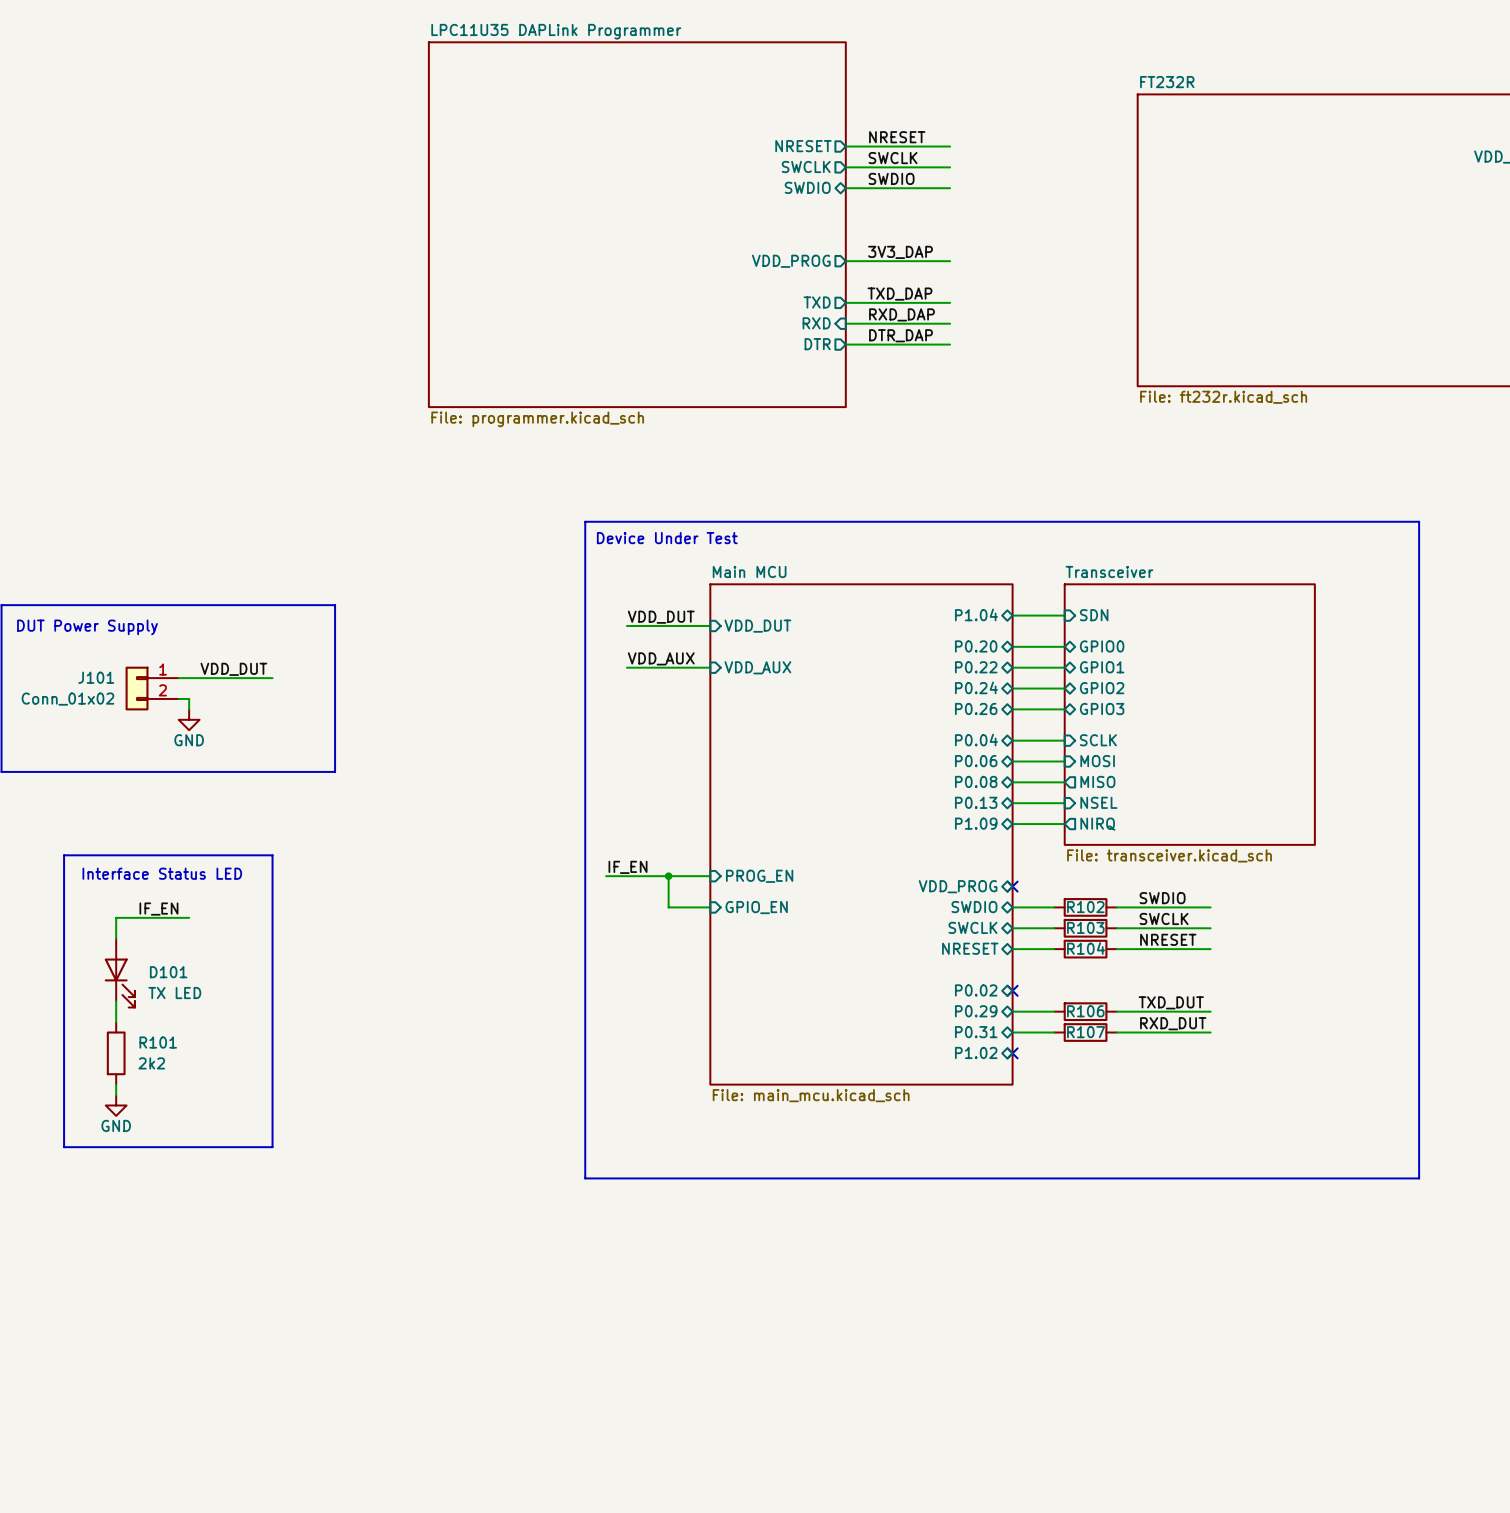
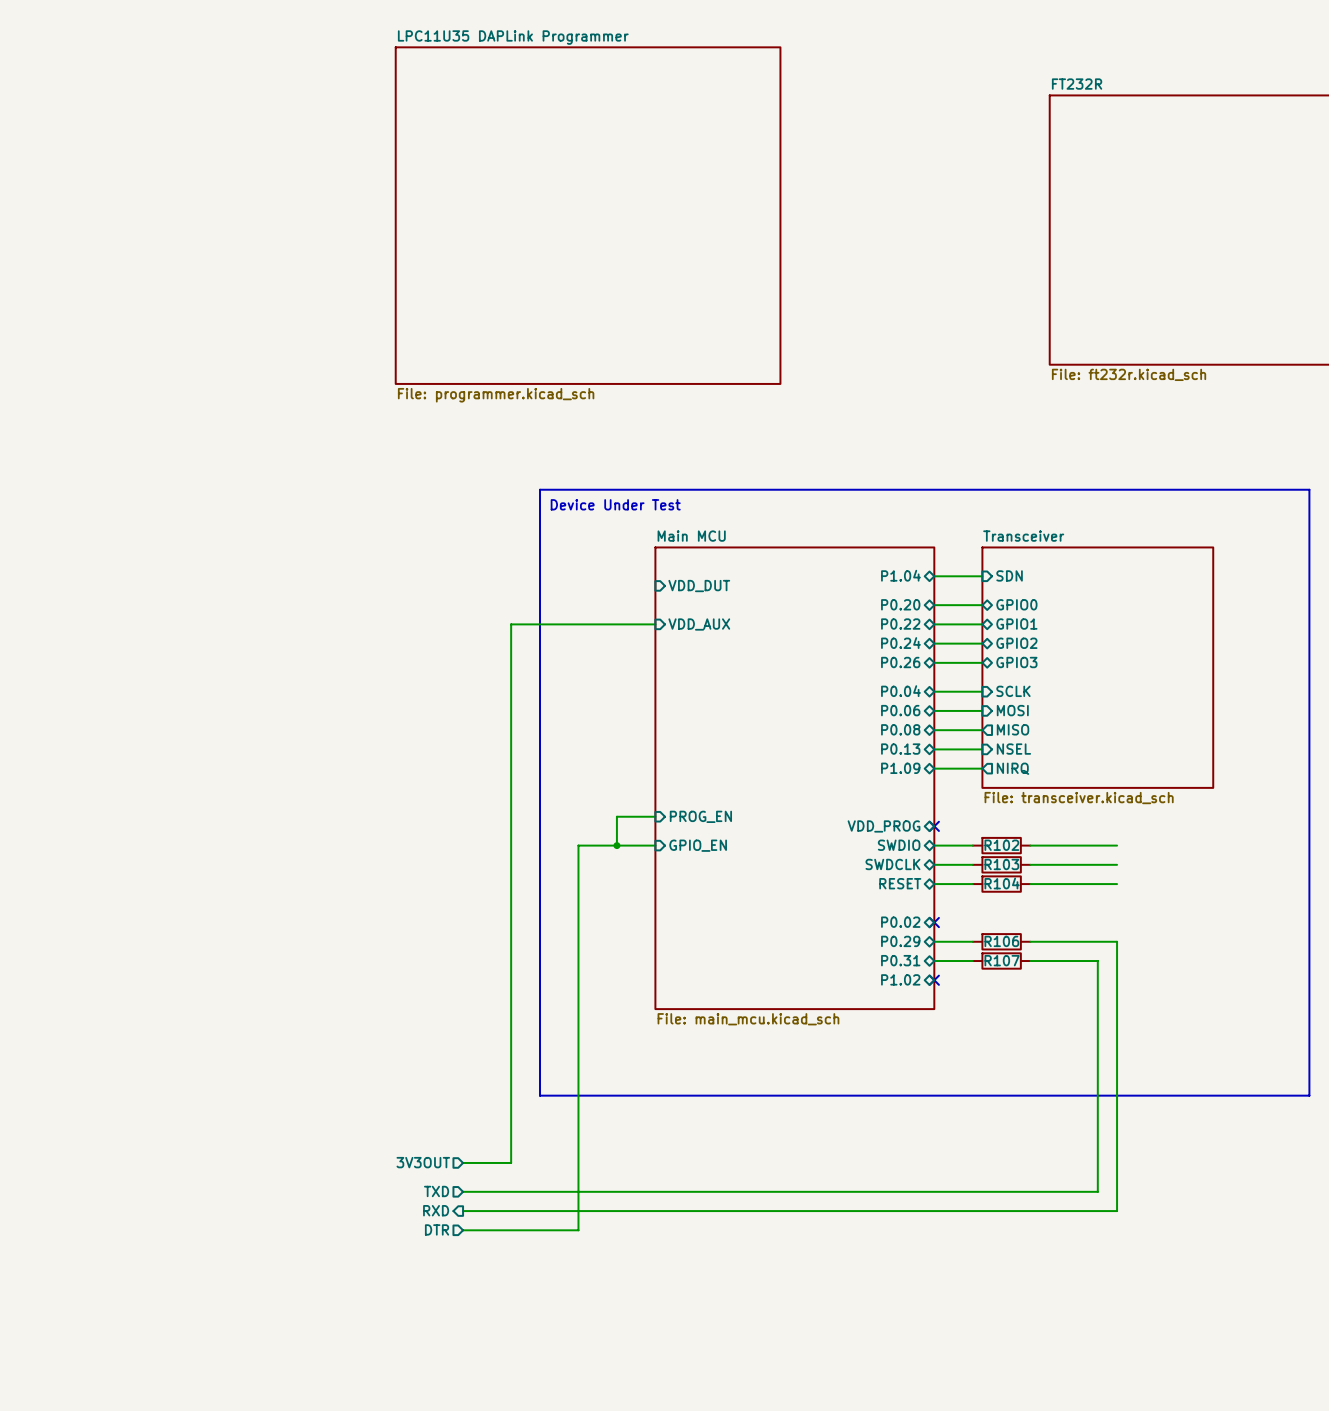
label: NRESET (897, 137) -> none
sheet pin: NRESET (803, 146) -> none
wire: (845, 146) (950, 146) -> none
label: SWCLK (893, 158) -> none
sheet pin: SWCLK (806, 166) -> none
wire: (845, 167) (950, 167) -> none
label: SWDIO (891, 178) -> none
sheet pin: SWDIO (807, 187) -> none
wire: (845, 188) (950, 188) -> none
label: 3V3_DAP (900, 252) -> none
sheet pin: VDD_PROG (791, 261) -> none
wire: (845, 261) (950, 261) -> none
label: TXD_DAP (900, 294) -> none
sheet pin: TXD (817, 302) -> none
wire: (845, 302) (950, 302) -> none
label: RXD_DAP (901, 314) -> none
sheet pin: RXD (816, 323) -> none
wire: (845, 323) (950, 323) -> none
label: DTR_DAP (901, 335) -> none
sheet pin: DTR (817, 344) -> none
wire: (845, 344) (950, 344) -> none
line: (1, 605) (335, 605) (335, 771) (1, 771) (1, 605) -> none
label: VDD_DUT (661, 617) -> none
wire: (626, 626) (710, 626) -> none
text: DUT Power Supply (87, 627) -> none
label: VDD_AUX (661, 658) -> none
wire: none -> (578, 624) (511, 624) (511, 1162) (463, 1162)
label: VDD_DUT (233, 669) -> none
wire: (178, 678) (272, 678) -> none
J101: Conn_01x02 (152, 688) -> none
wire: (178, 698) (189, 698) (189, 709) -> none
power symbol: GND (189, 719) -> none
line: (64, 855) (272, 855) (272, 1147) (64, 1147) (64, 855) -> none
label: IF_EN (628, 867) -> none
text: Interface Status LED (162, 873) -> none
wire: (606, 876) (668, 876) -> none
junction position: (668, 876) -> (616, 845)
label: SWDIO (1162, 898) -> none
wire: none -> (616, 845) (578, 845) (578, 1230) (463, 1230)
label: IF_EN (158, 909) -> none
wire: (189, 917) (116, 917) (116, 938) -> none
label: SWCLK (1164, 918) -> none
sheet pin: SWCLK (972, 927) -> SWDCLK (892, 864)
label: NRESET (1168, 939) -> none
sheet pin: NRESET (970, 948) -> RESET (900, 883)
D101: TX LED (119, 973) -> none
wire: (116, 1001) (116, 1022) -> none
label: TXD_DUT (1171, 1002) -> none
wire: none -> (1117, 941) (1117, 1211) (463, 1211)
label: RXD_DUT (1173, 1023) -> none
wire: (1189, 1032) (1210, 1032) -> (1097, 961) (1097, 1191) (463, 1191)
R101: 2k2 (116, 1053) -> none
wire: (116, 1084) (116, 1095) -> none
power symbol: GND (116, 1105) -> none
sheet pin: none -> 3V3OUT (423, 1162)
sheet pin: none -> TXD (436, 1191)
sheet pin: none -> RXD (436, 1210)
sheet pin: none -> DTR (437, 1229)

